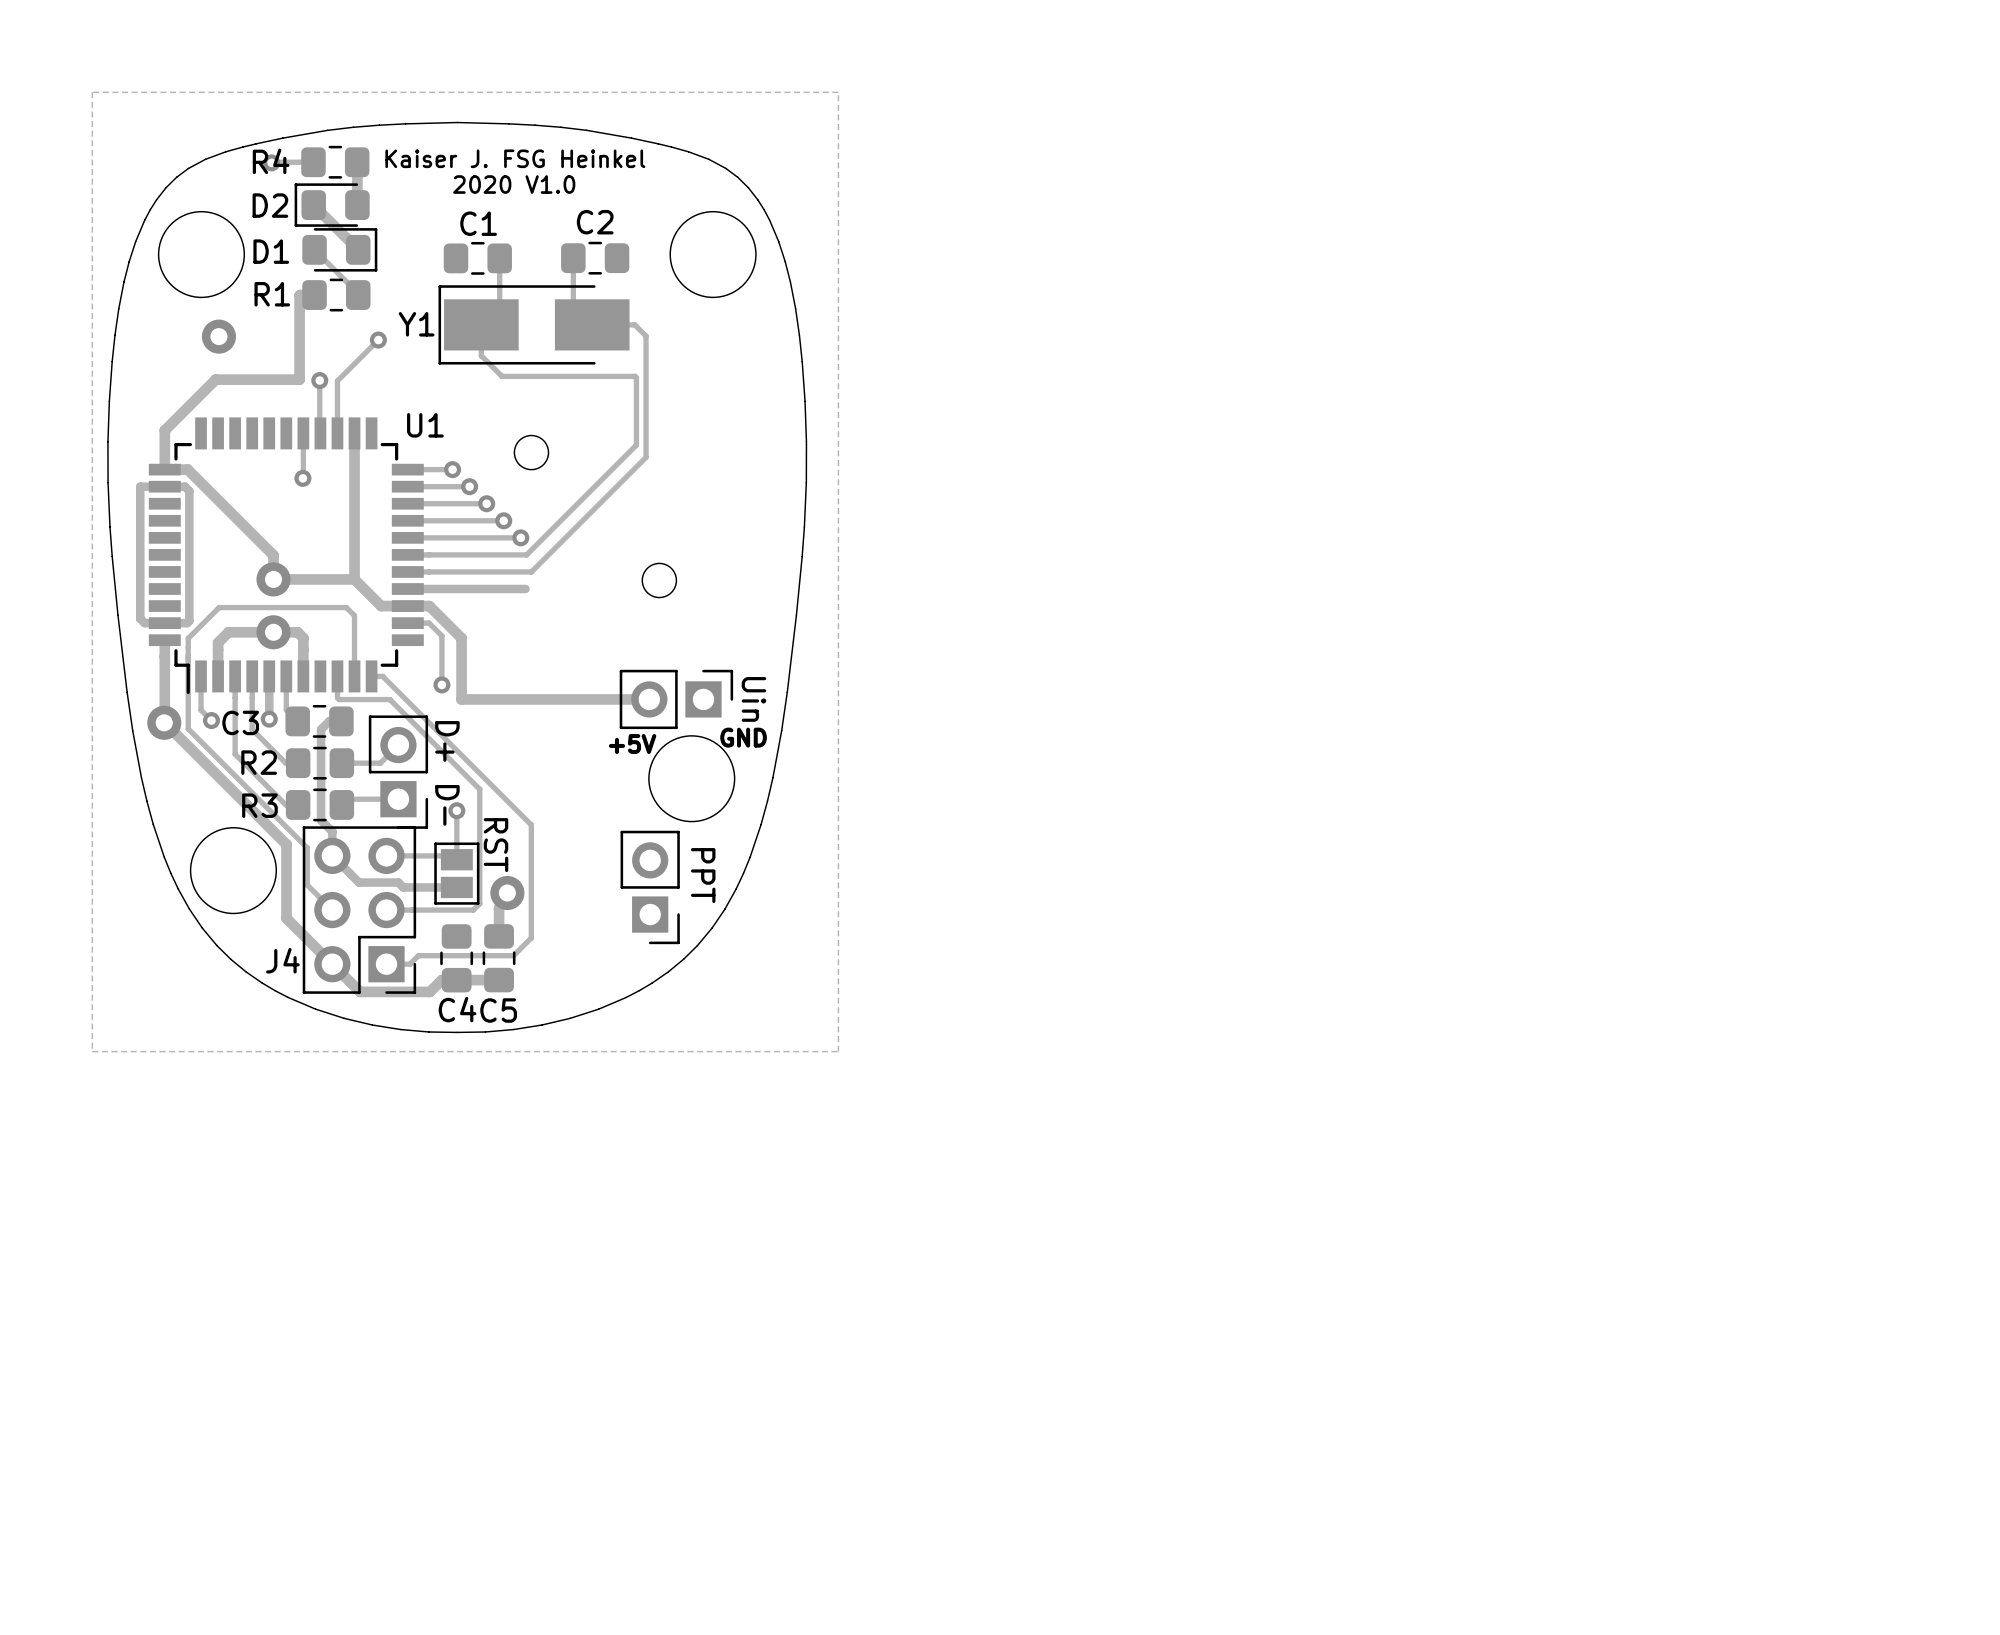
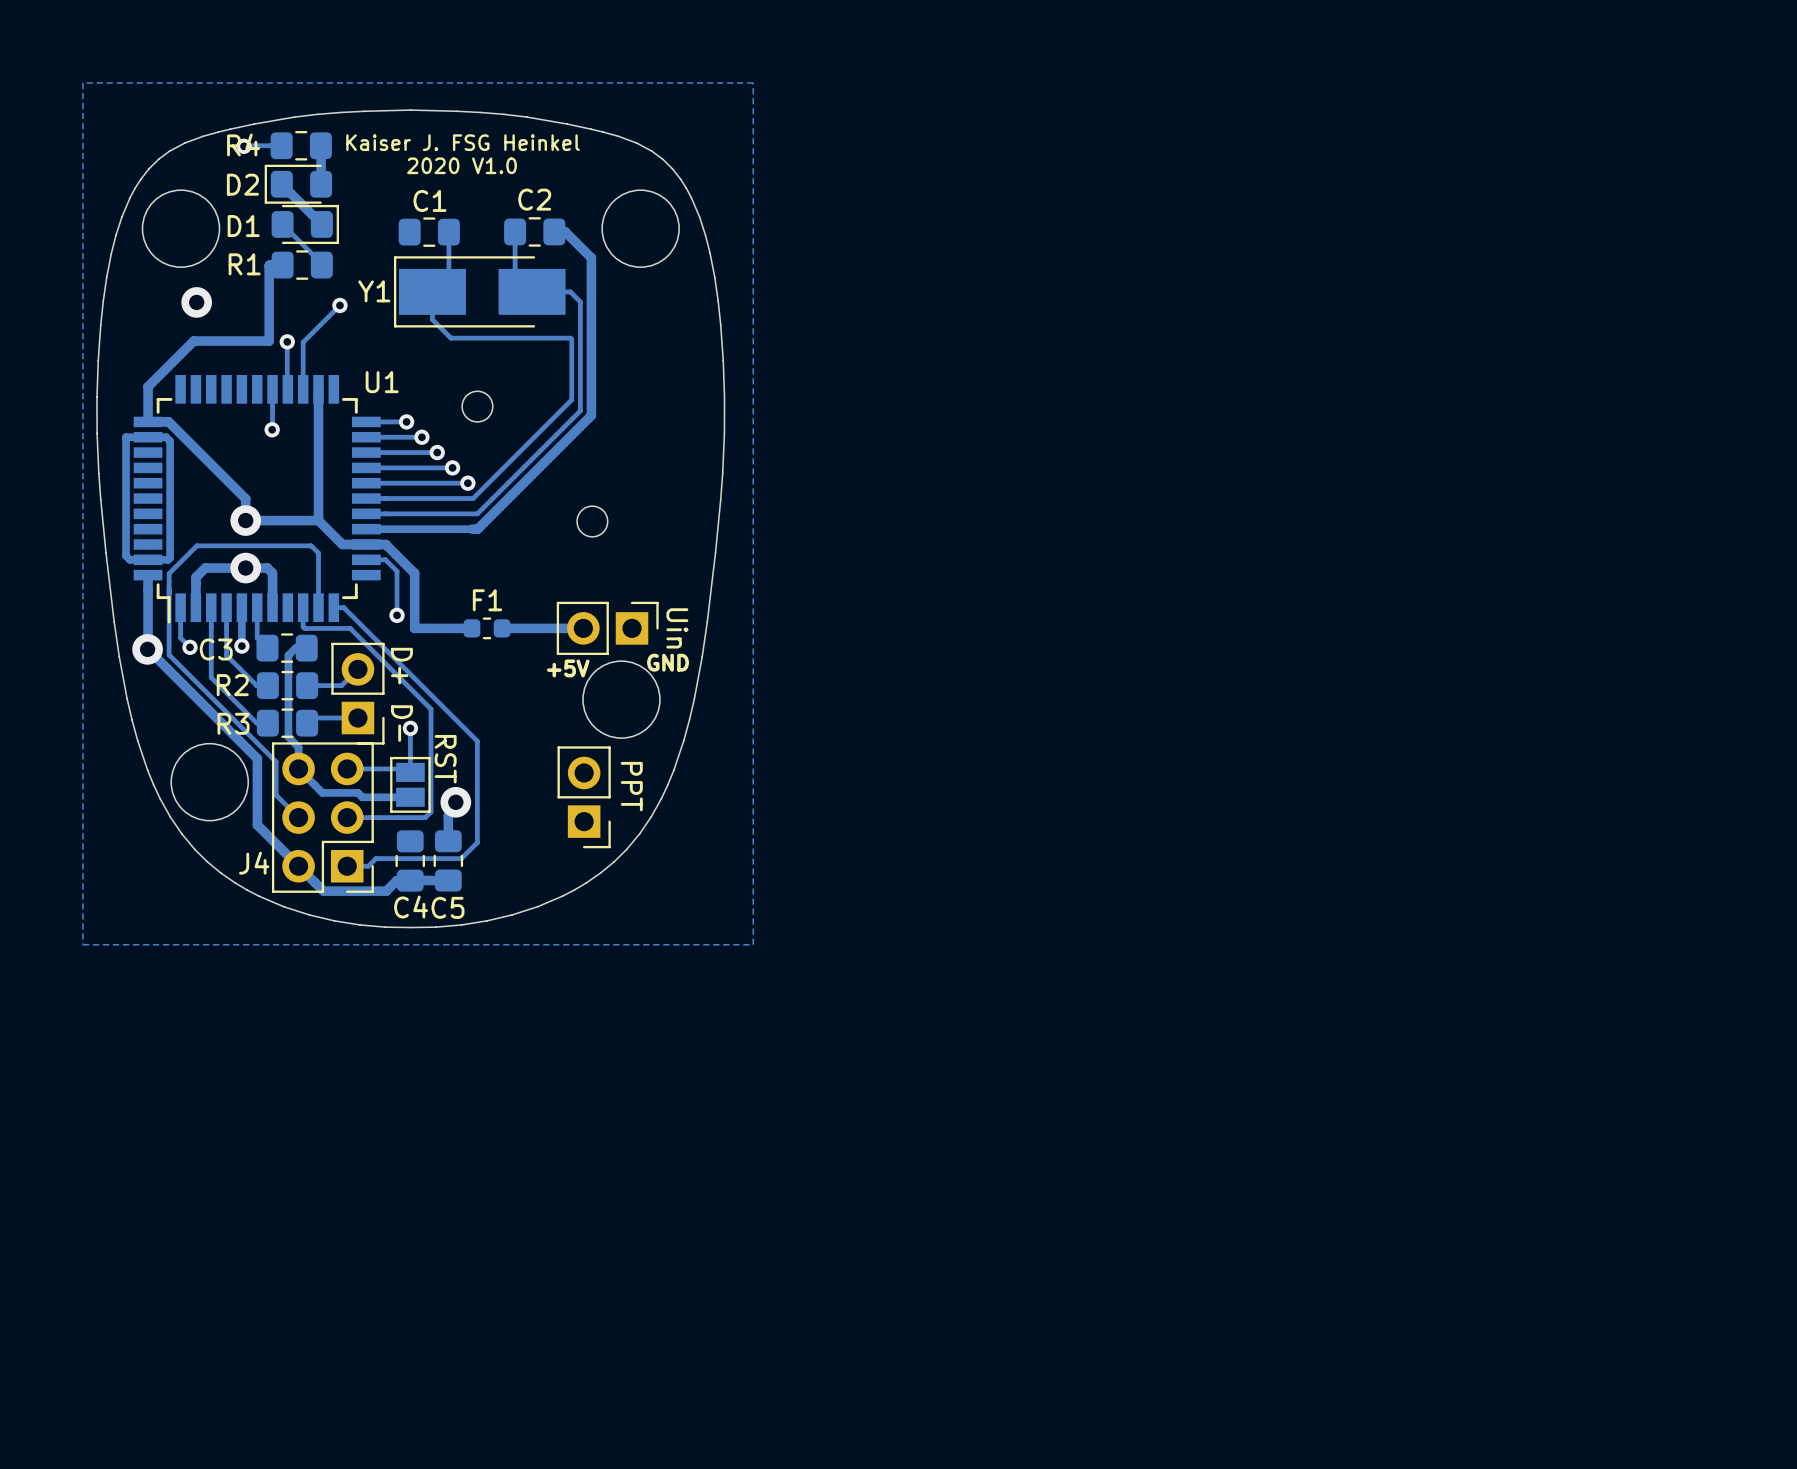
track: none -> (554, 231) (565, 231) (591, 257) (591, 415) (477, 529) (472, 529)
F1: none -> (487, 628)
track: (558, 699) (525, 699) -> none

